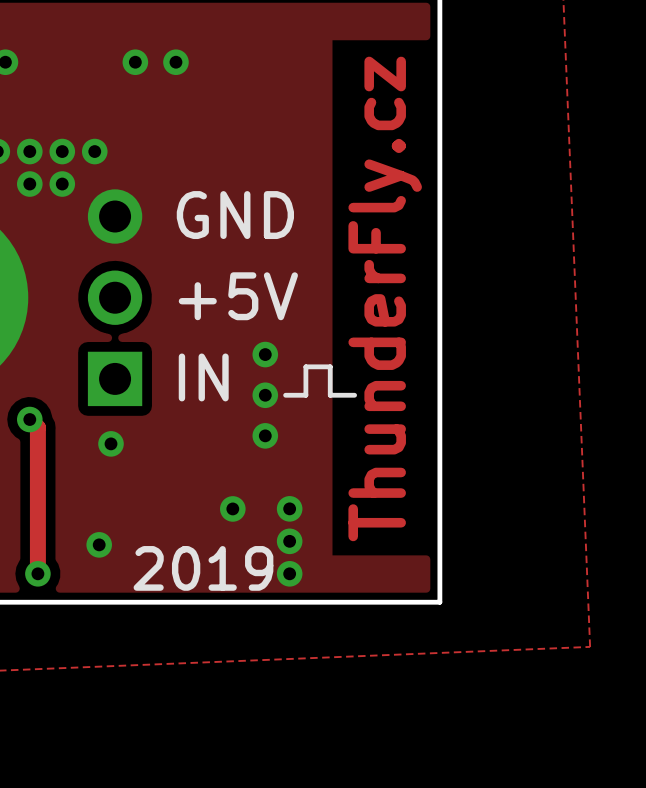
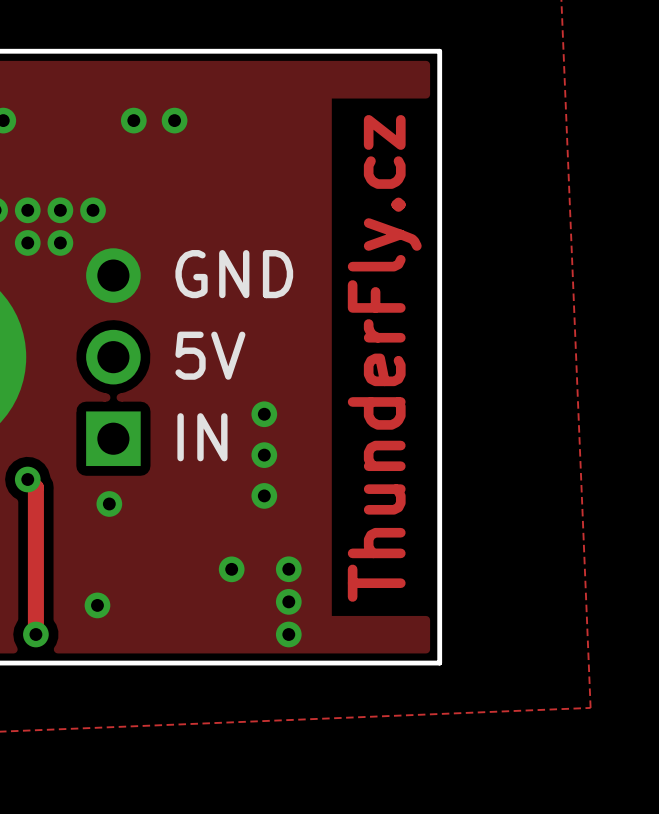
text: +5V (238, 296) -> 5V (210, 355)
line: (285, 395) (305, 395) (305, 366) (330, 366) (330, 395) (354, 395) -> none
text: 2019 (203, 568) -> none

